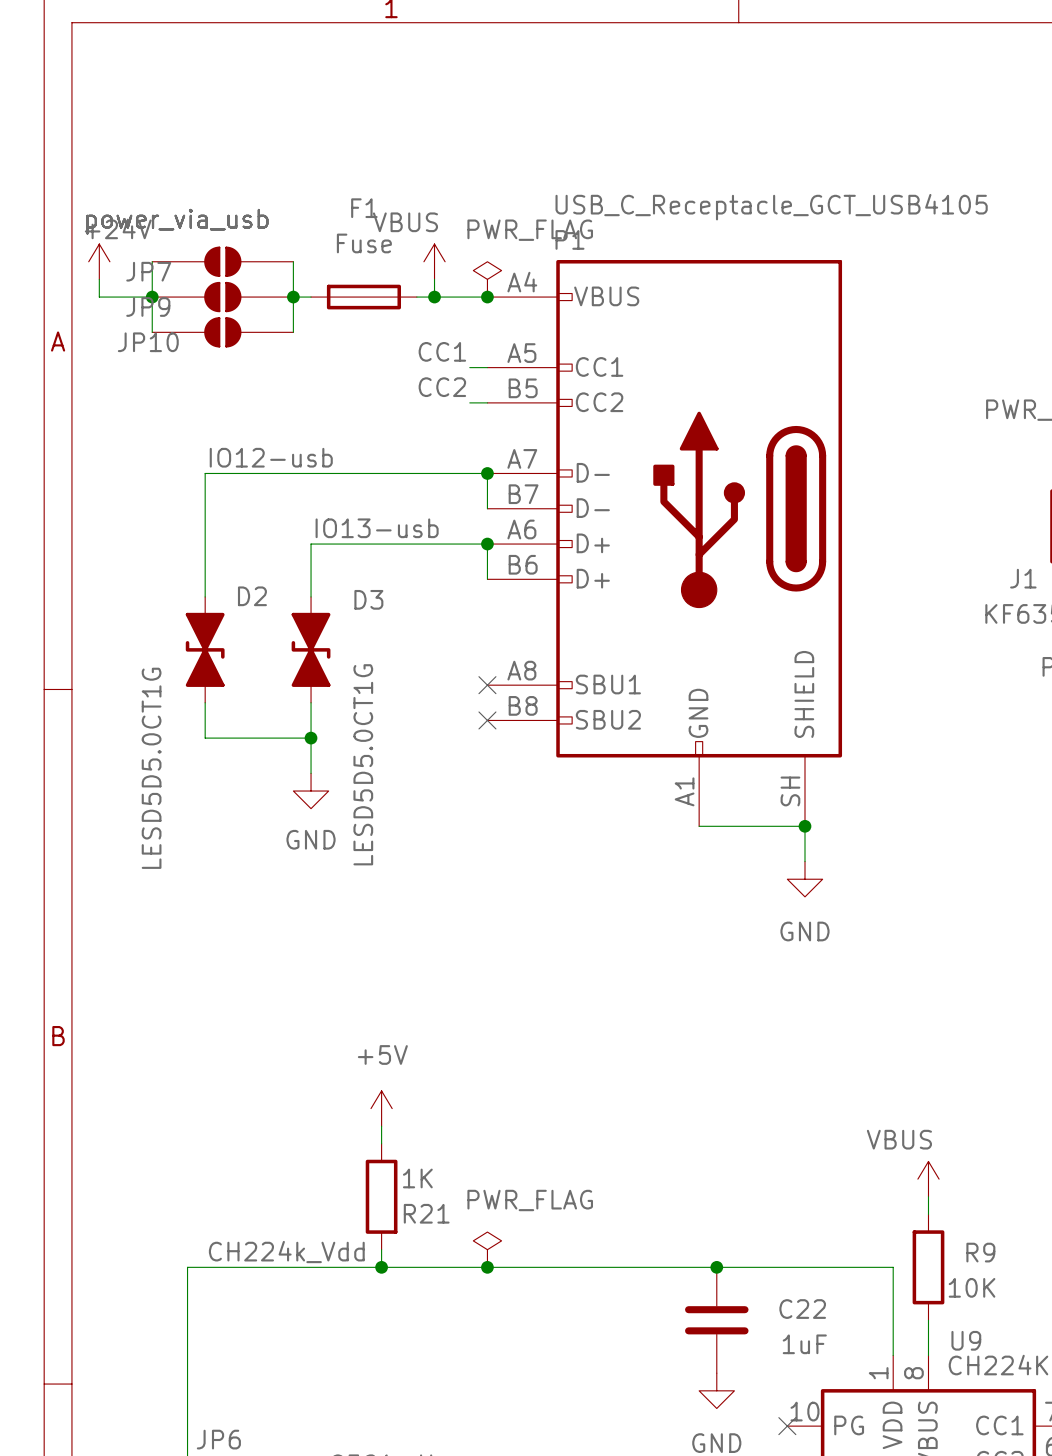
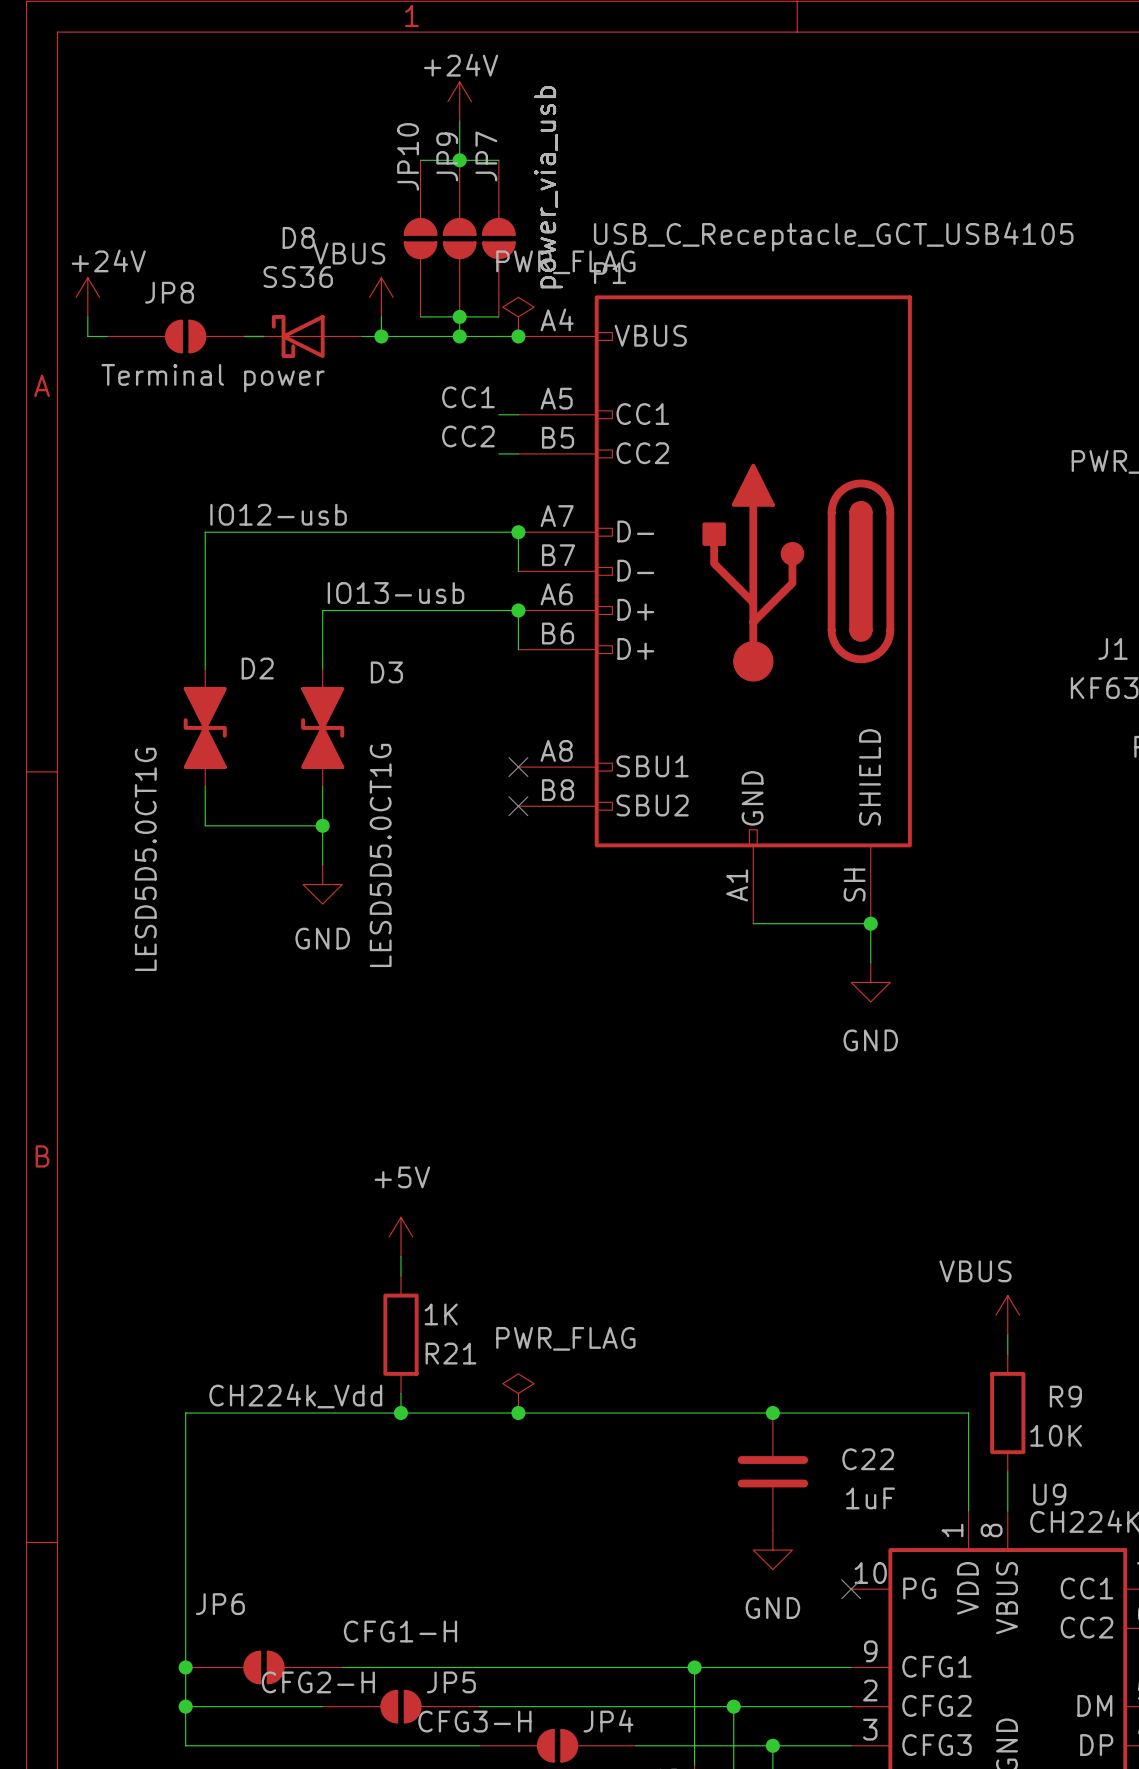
power symbol: none -> +24V (459, 101)
wire: none -> (459, 121) (459, 160)
wire: none -> (420, 160) (498, 160)
junction: none -> (459, 160)
wire: (152, 261) (152, 332) -> none
JP7 rotation: 0° (222, 261) -> 90° clockwise (498, 238)
JP7 position: (222, 261) -> (498, 238)
wire: (293, 261) (293, 332) -> none
power symbol position: VBUS (434, 261) -> VBUS (381, 297)
wire: none -> (381, 316) (381, 336)
wire: none -> (420, 316) (498, 316)
junction: none -> (459, 316)
junction: (152, 297) -> none
JP8: none -> Terminal power (185, 336)
JP9 rotation: 0° (222, 297) -> 90° clockwise (459, 238)
JP9 position: (222, 297) -> (459, 238)
junction position: (293, 297) -> (381, 336)
D8: none -> SS36 (303, 336)
F1: Fuse (363, 297) -> none
JP10 rotation: 0° (222, 332) -> 90° clockwise (420, 238)
JP10 position: (222, 332) -> (420, 238)

